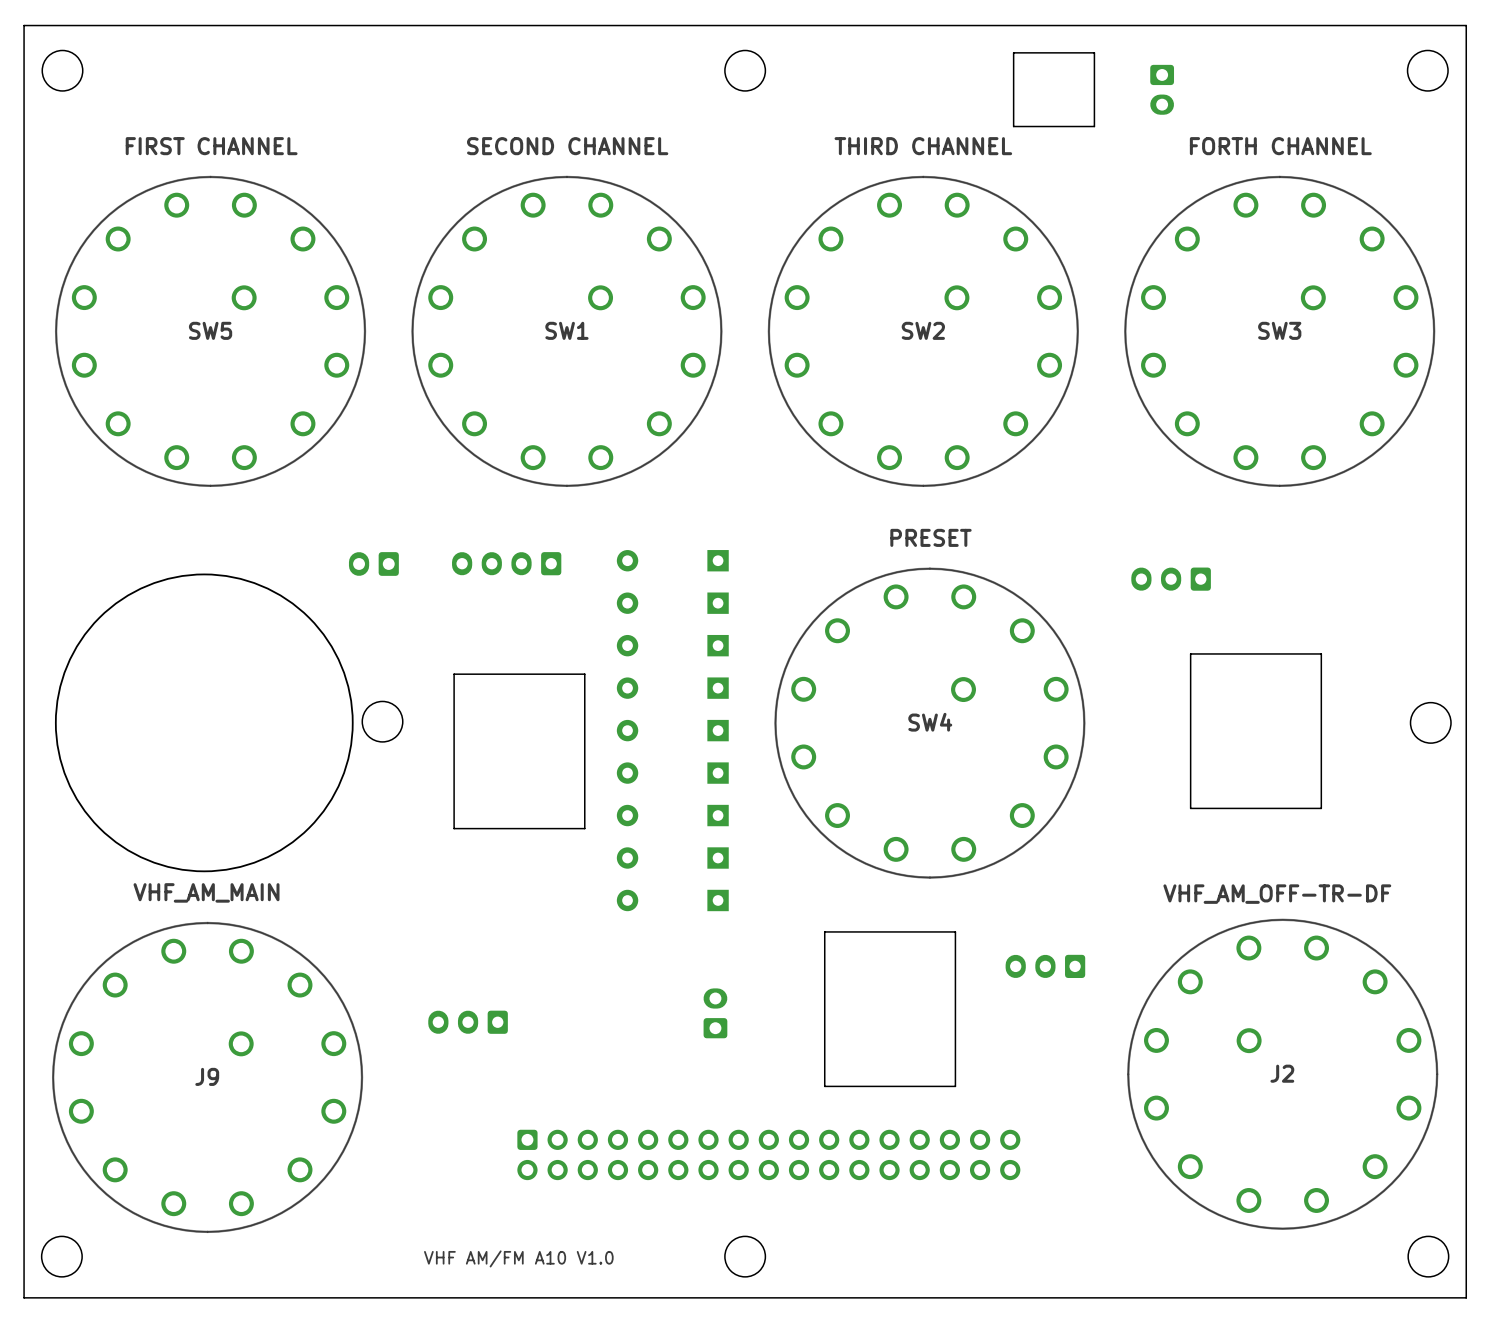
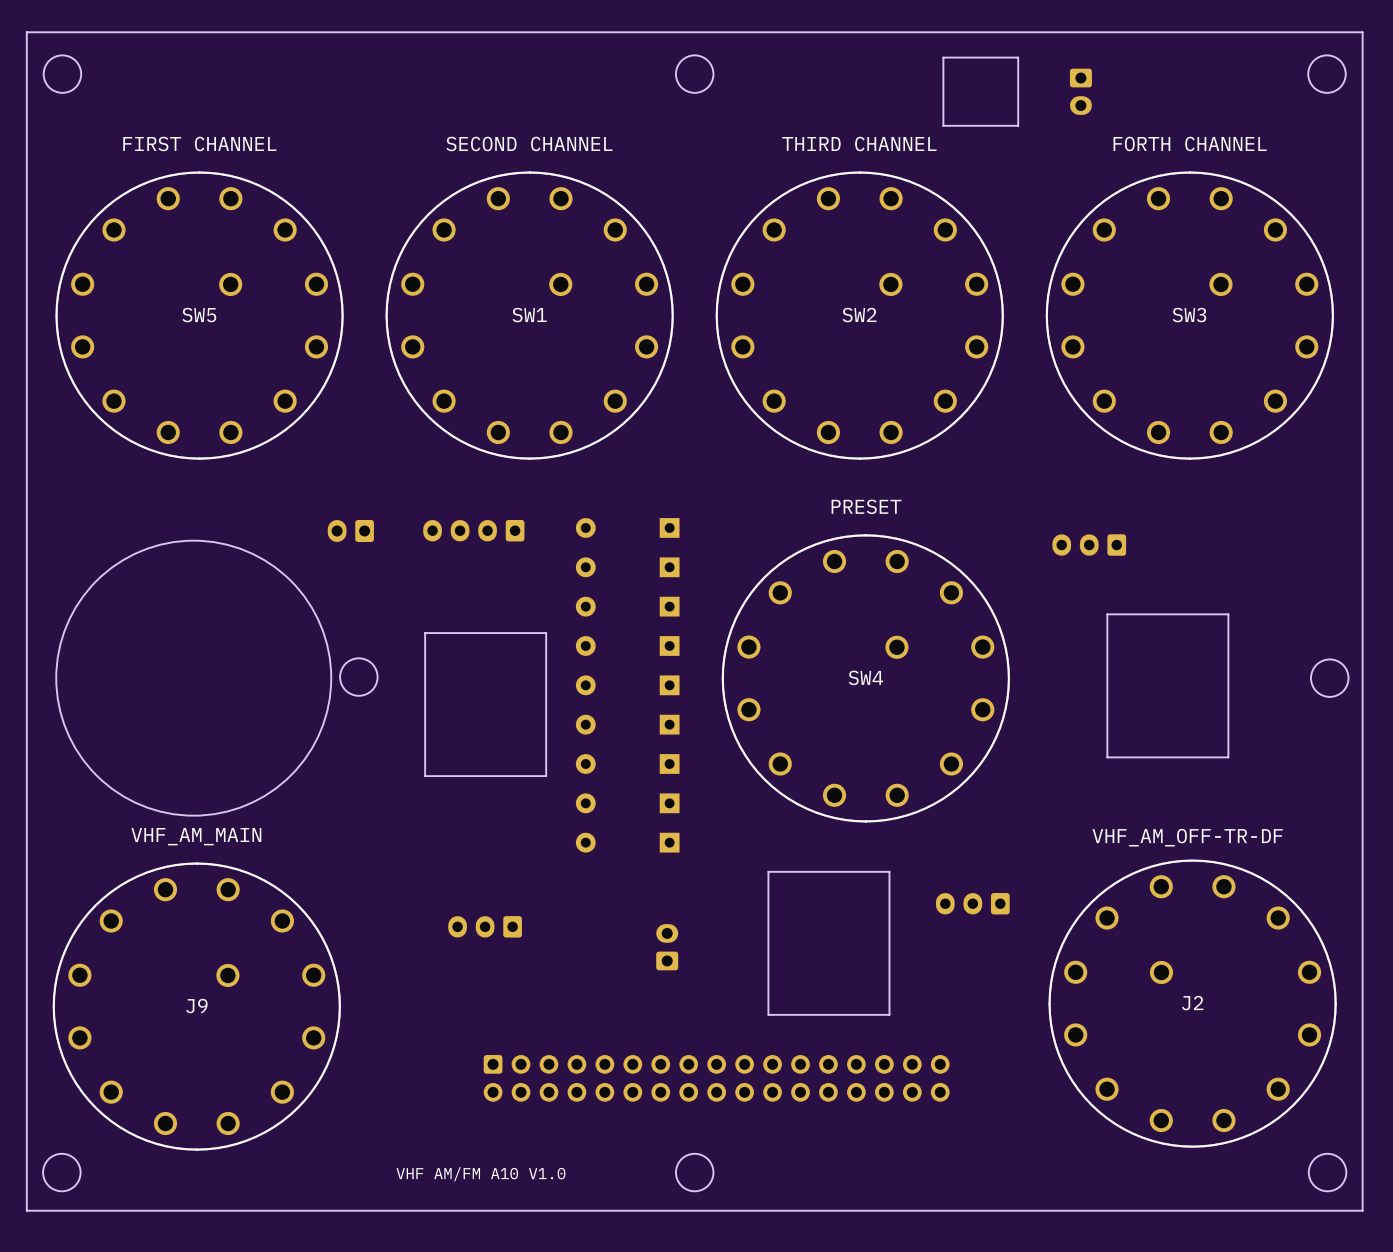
part position: (468, 1022) -> (485, 926)

